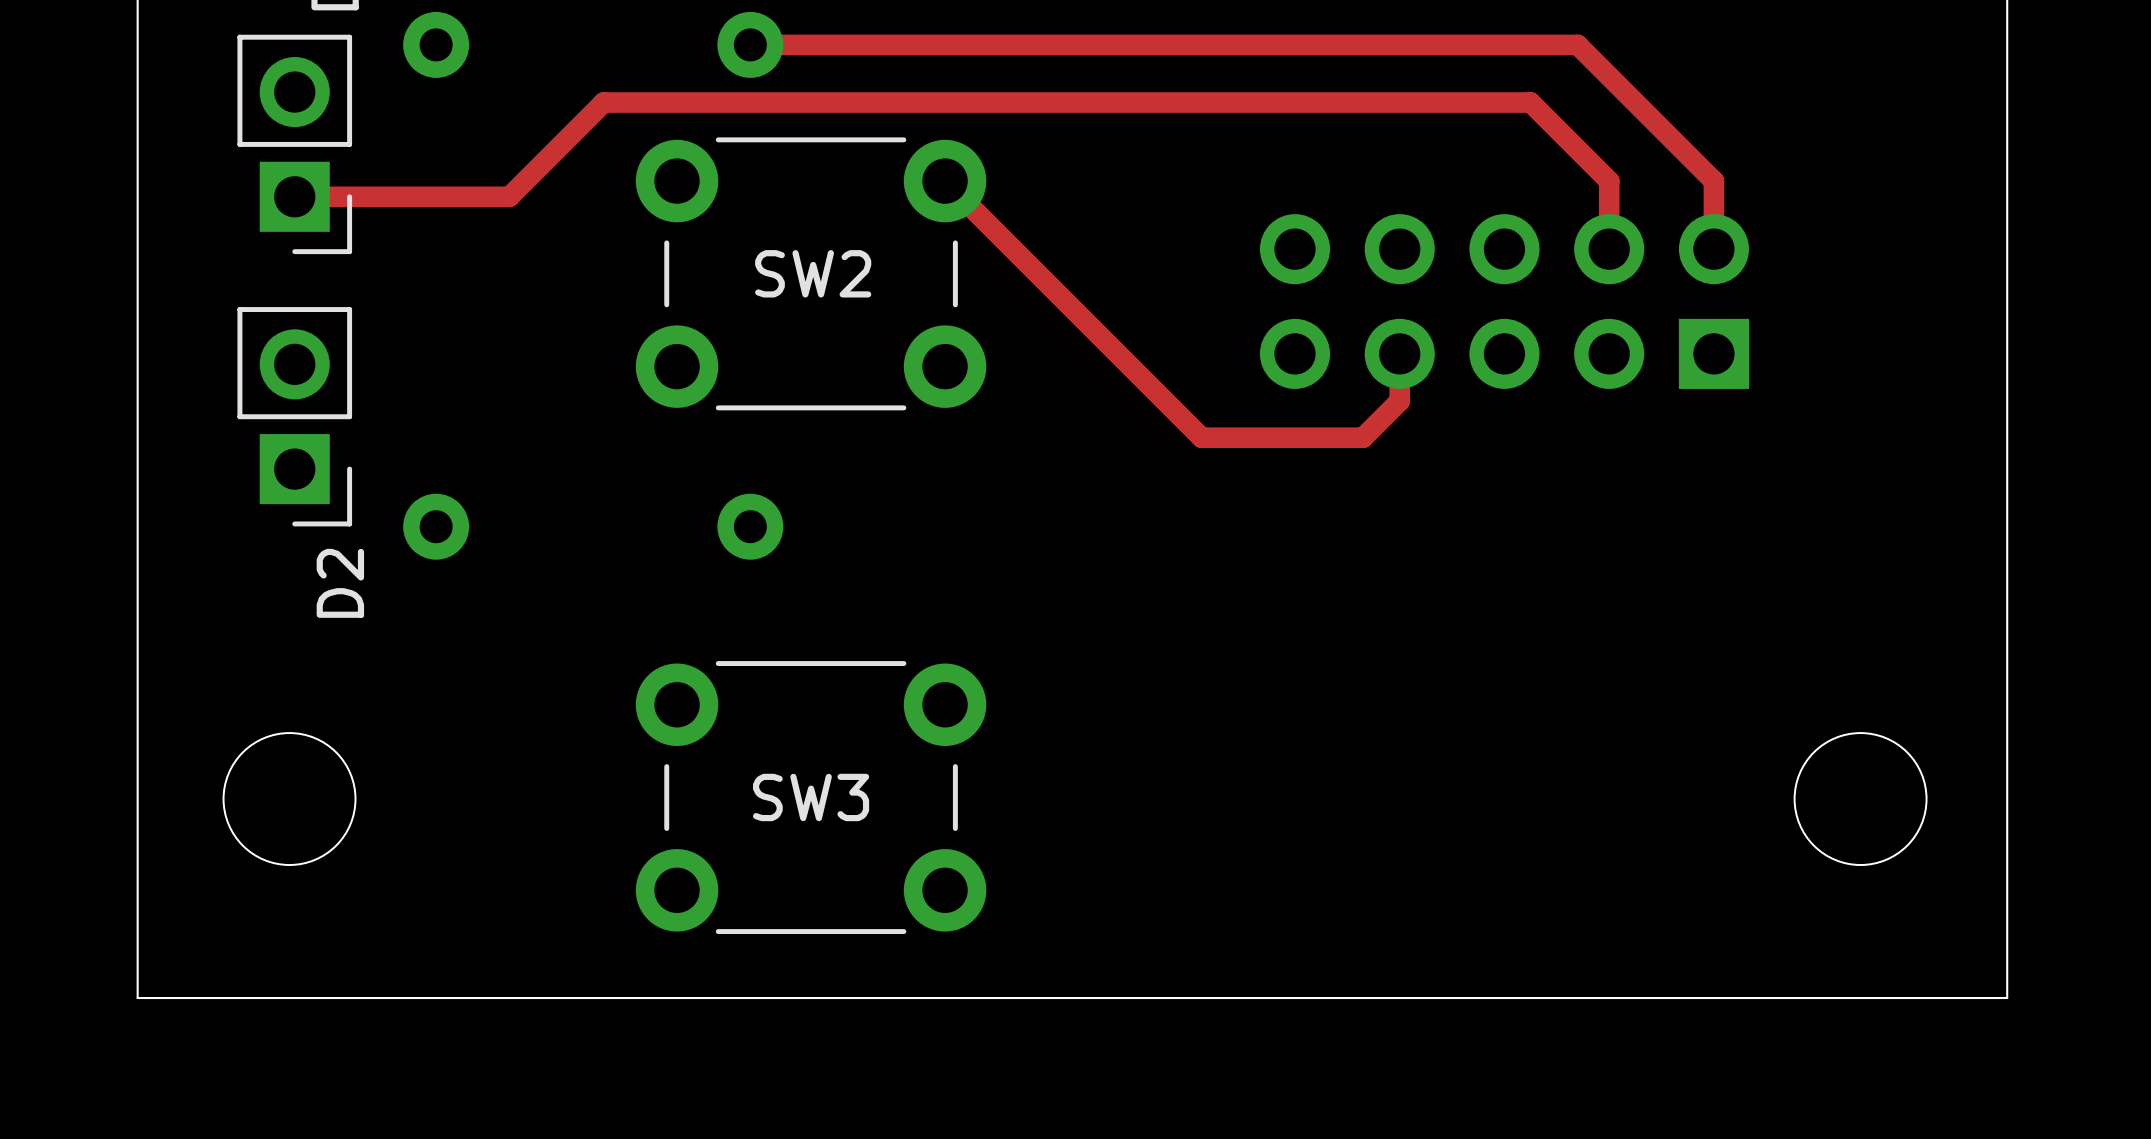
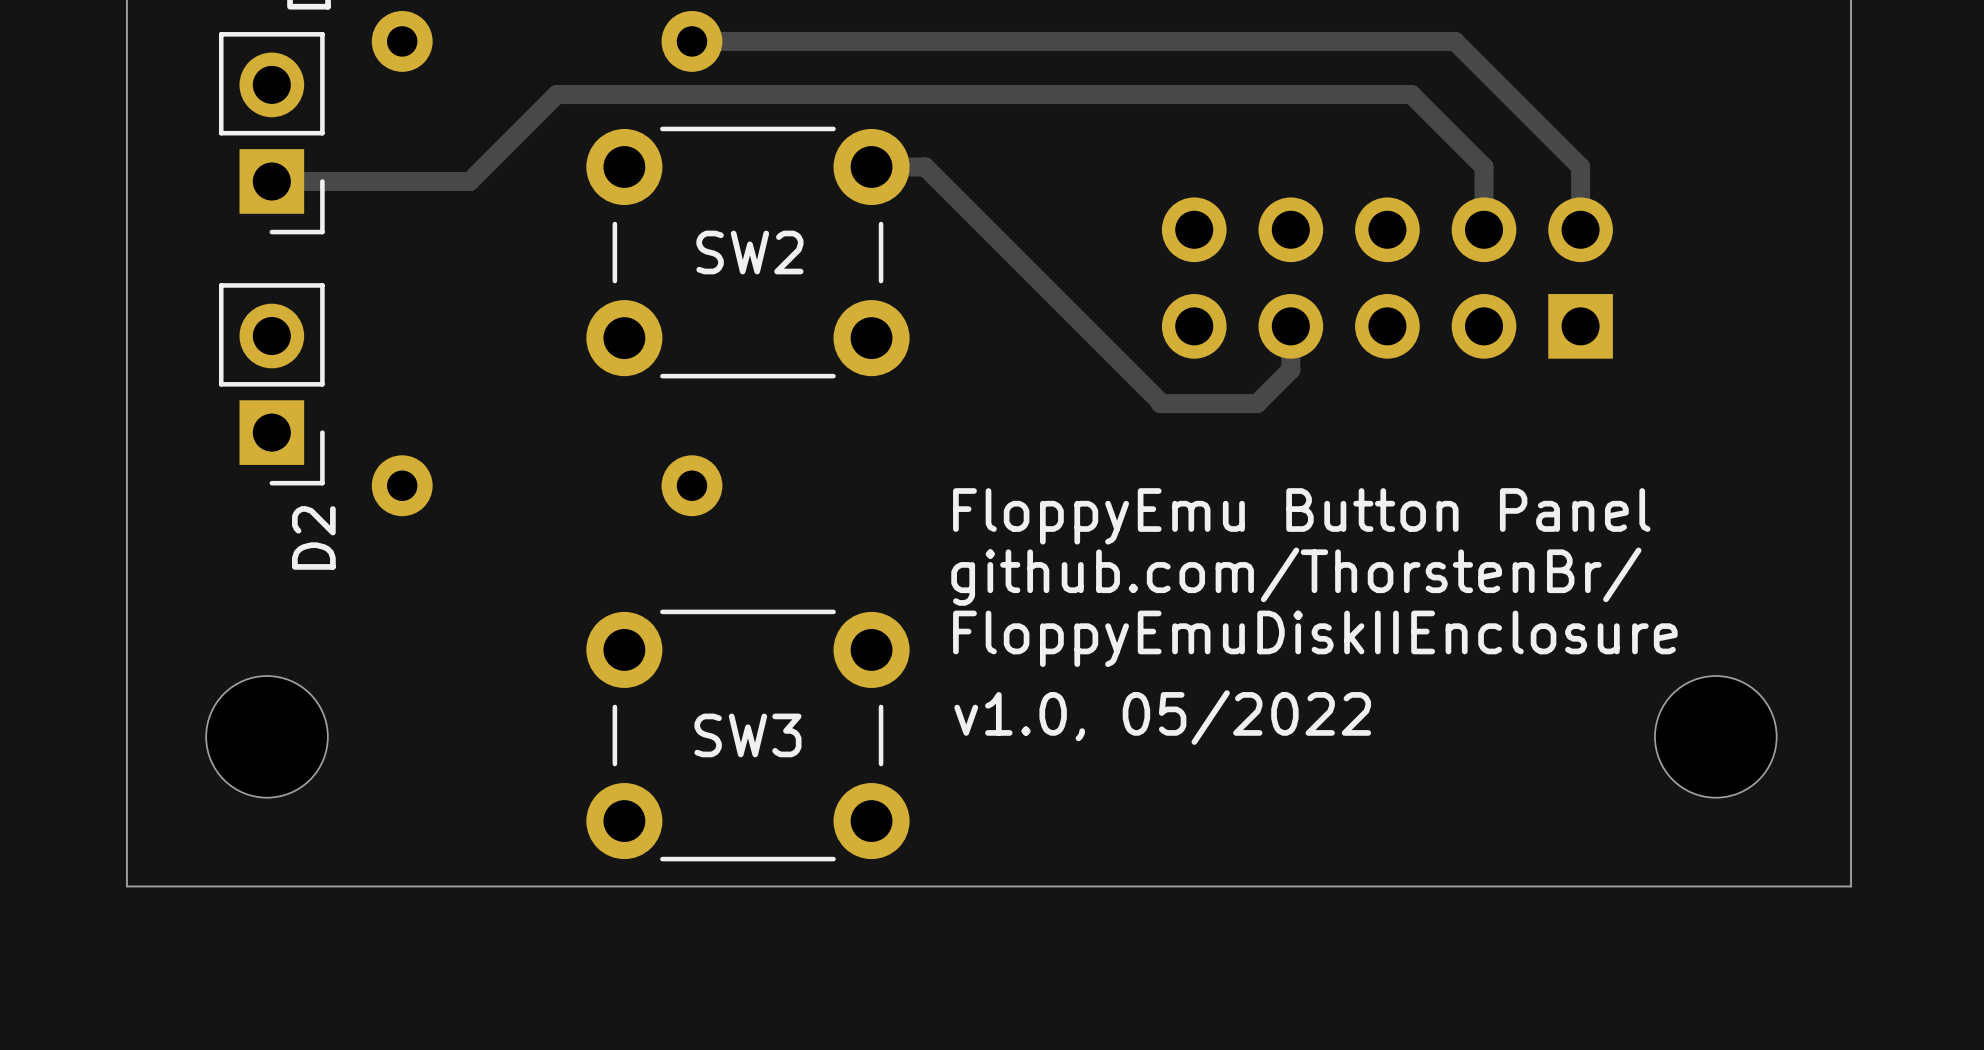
track: (945, 181) (1201, 437) (1258, 437) -> (871, 166) (925, 166) (1160, 403)
text: none -> FloppyEmu Button Panel (1301, 516)
text: none -> github.com/ThorstenBr/ (1296, 576)
text: none -> FloppyEmuDiskIIEnclosure (1315, 638)
text: none -> v1.0, 05/2022 (1162, 717)
board edge: (137, 961) (137, 998) (2007, 998) (2007, 961) -> (126, 886) (1851, 886)

